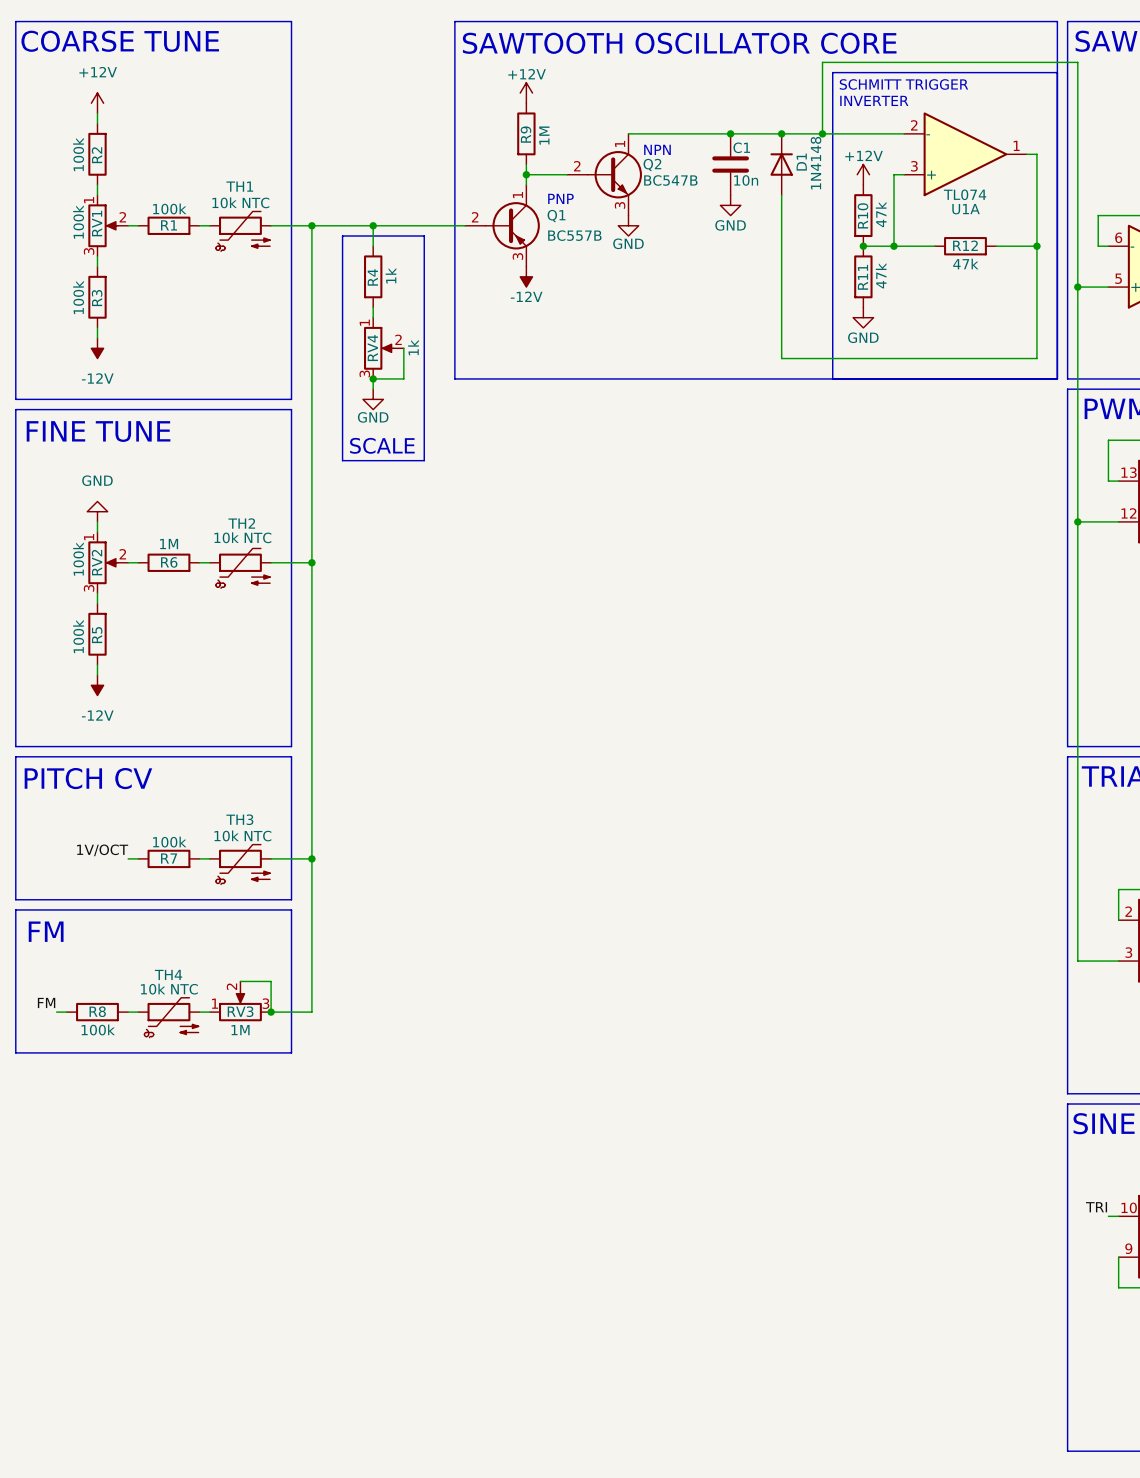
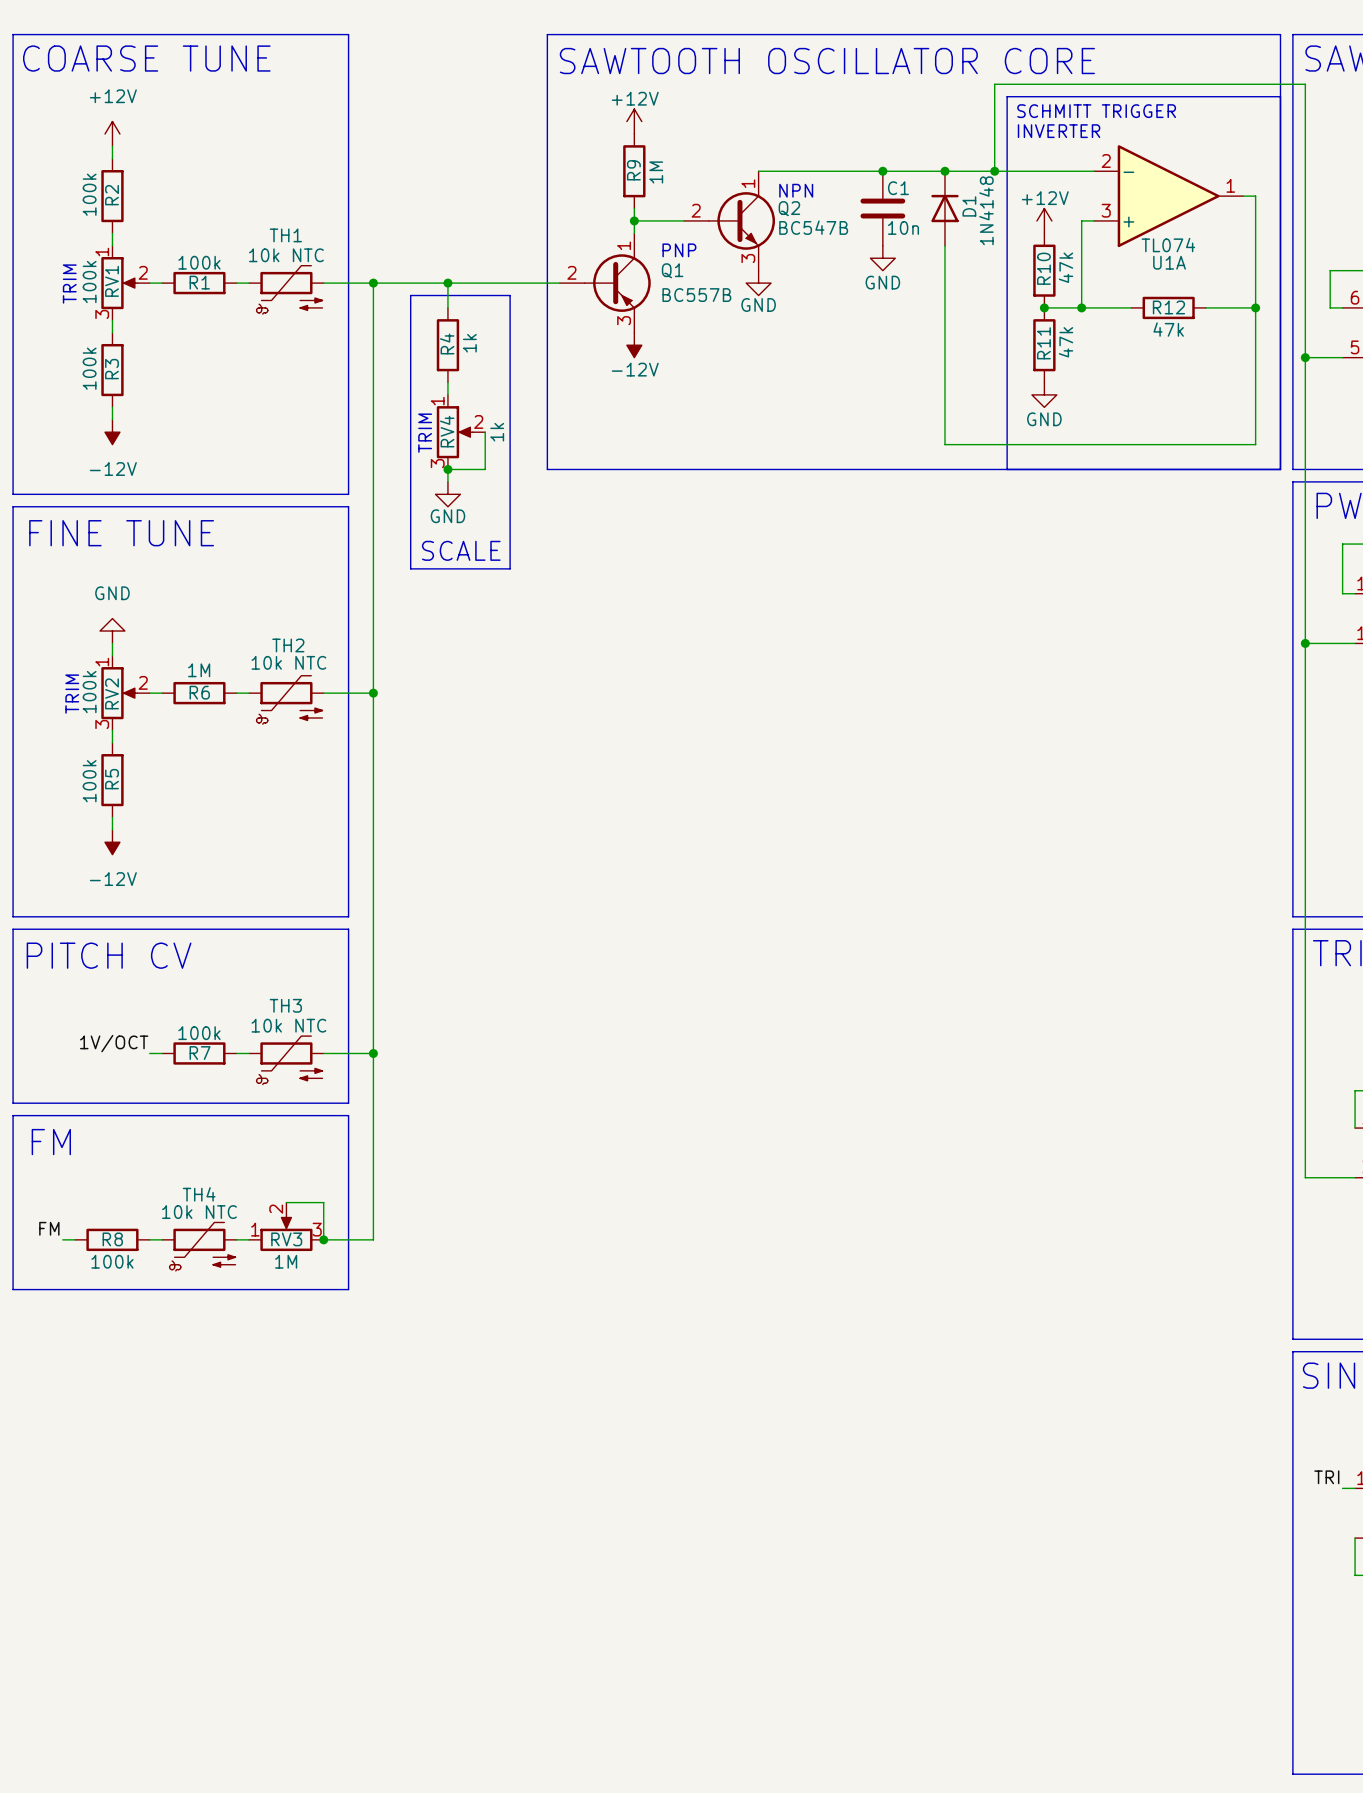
text: none -> TRIM (69, 284)
text: none -> TRIM (425, 433)
text: none -> TRIM (72, 694)

